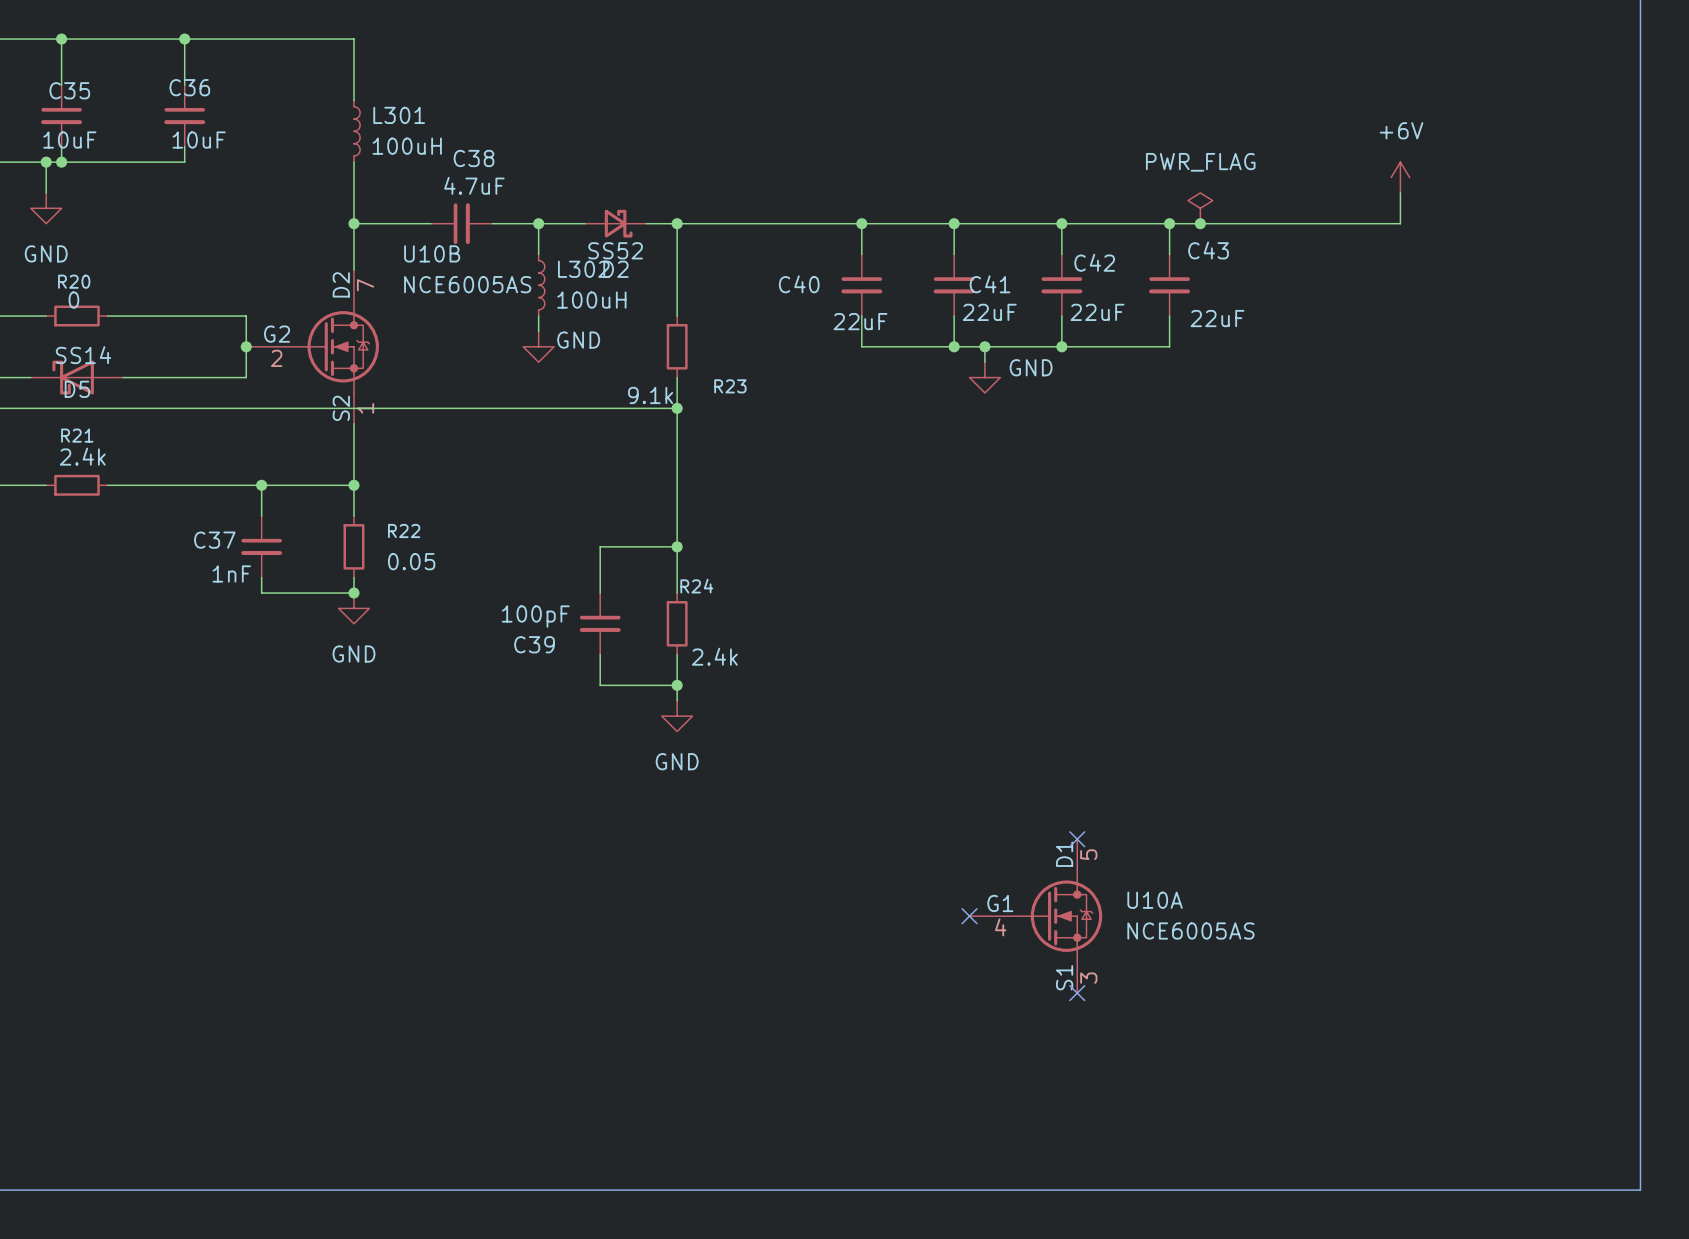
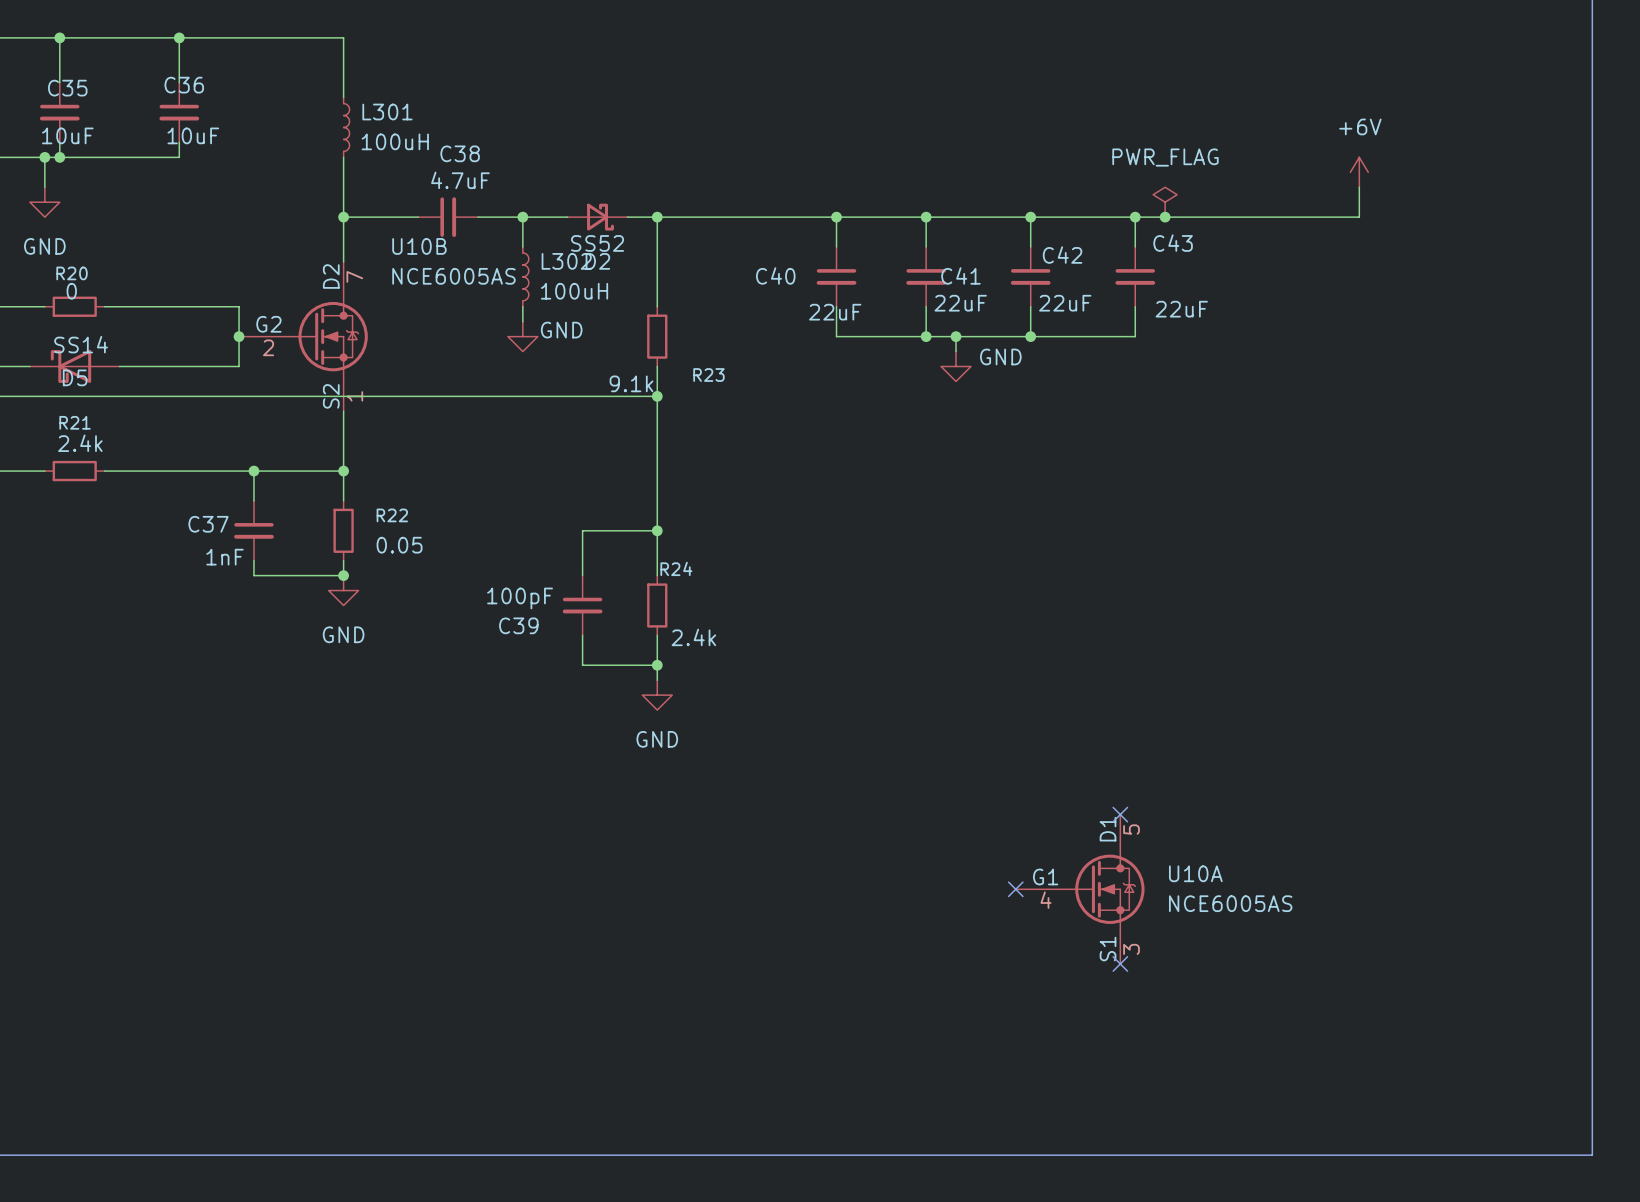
no-connect mark: (1077, 839) -> none
no-connect mark: none -> (1120, 814)
no-connect mark: (969, 916) -> none
U10A position: (1035, 916) -> (1080, 889)
no-connect mark: none -> (1015, 889)
no-connect mark: (1077, 993) -> none
no-connect mark: none -> (1120, 963)

